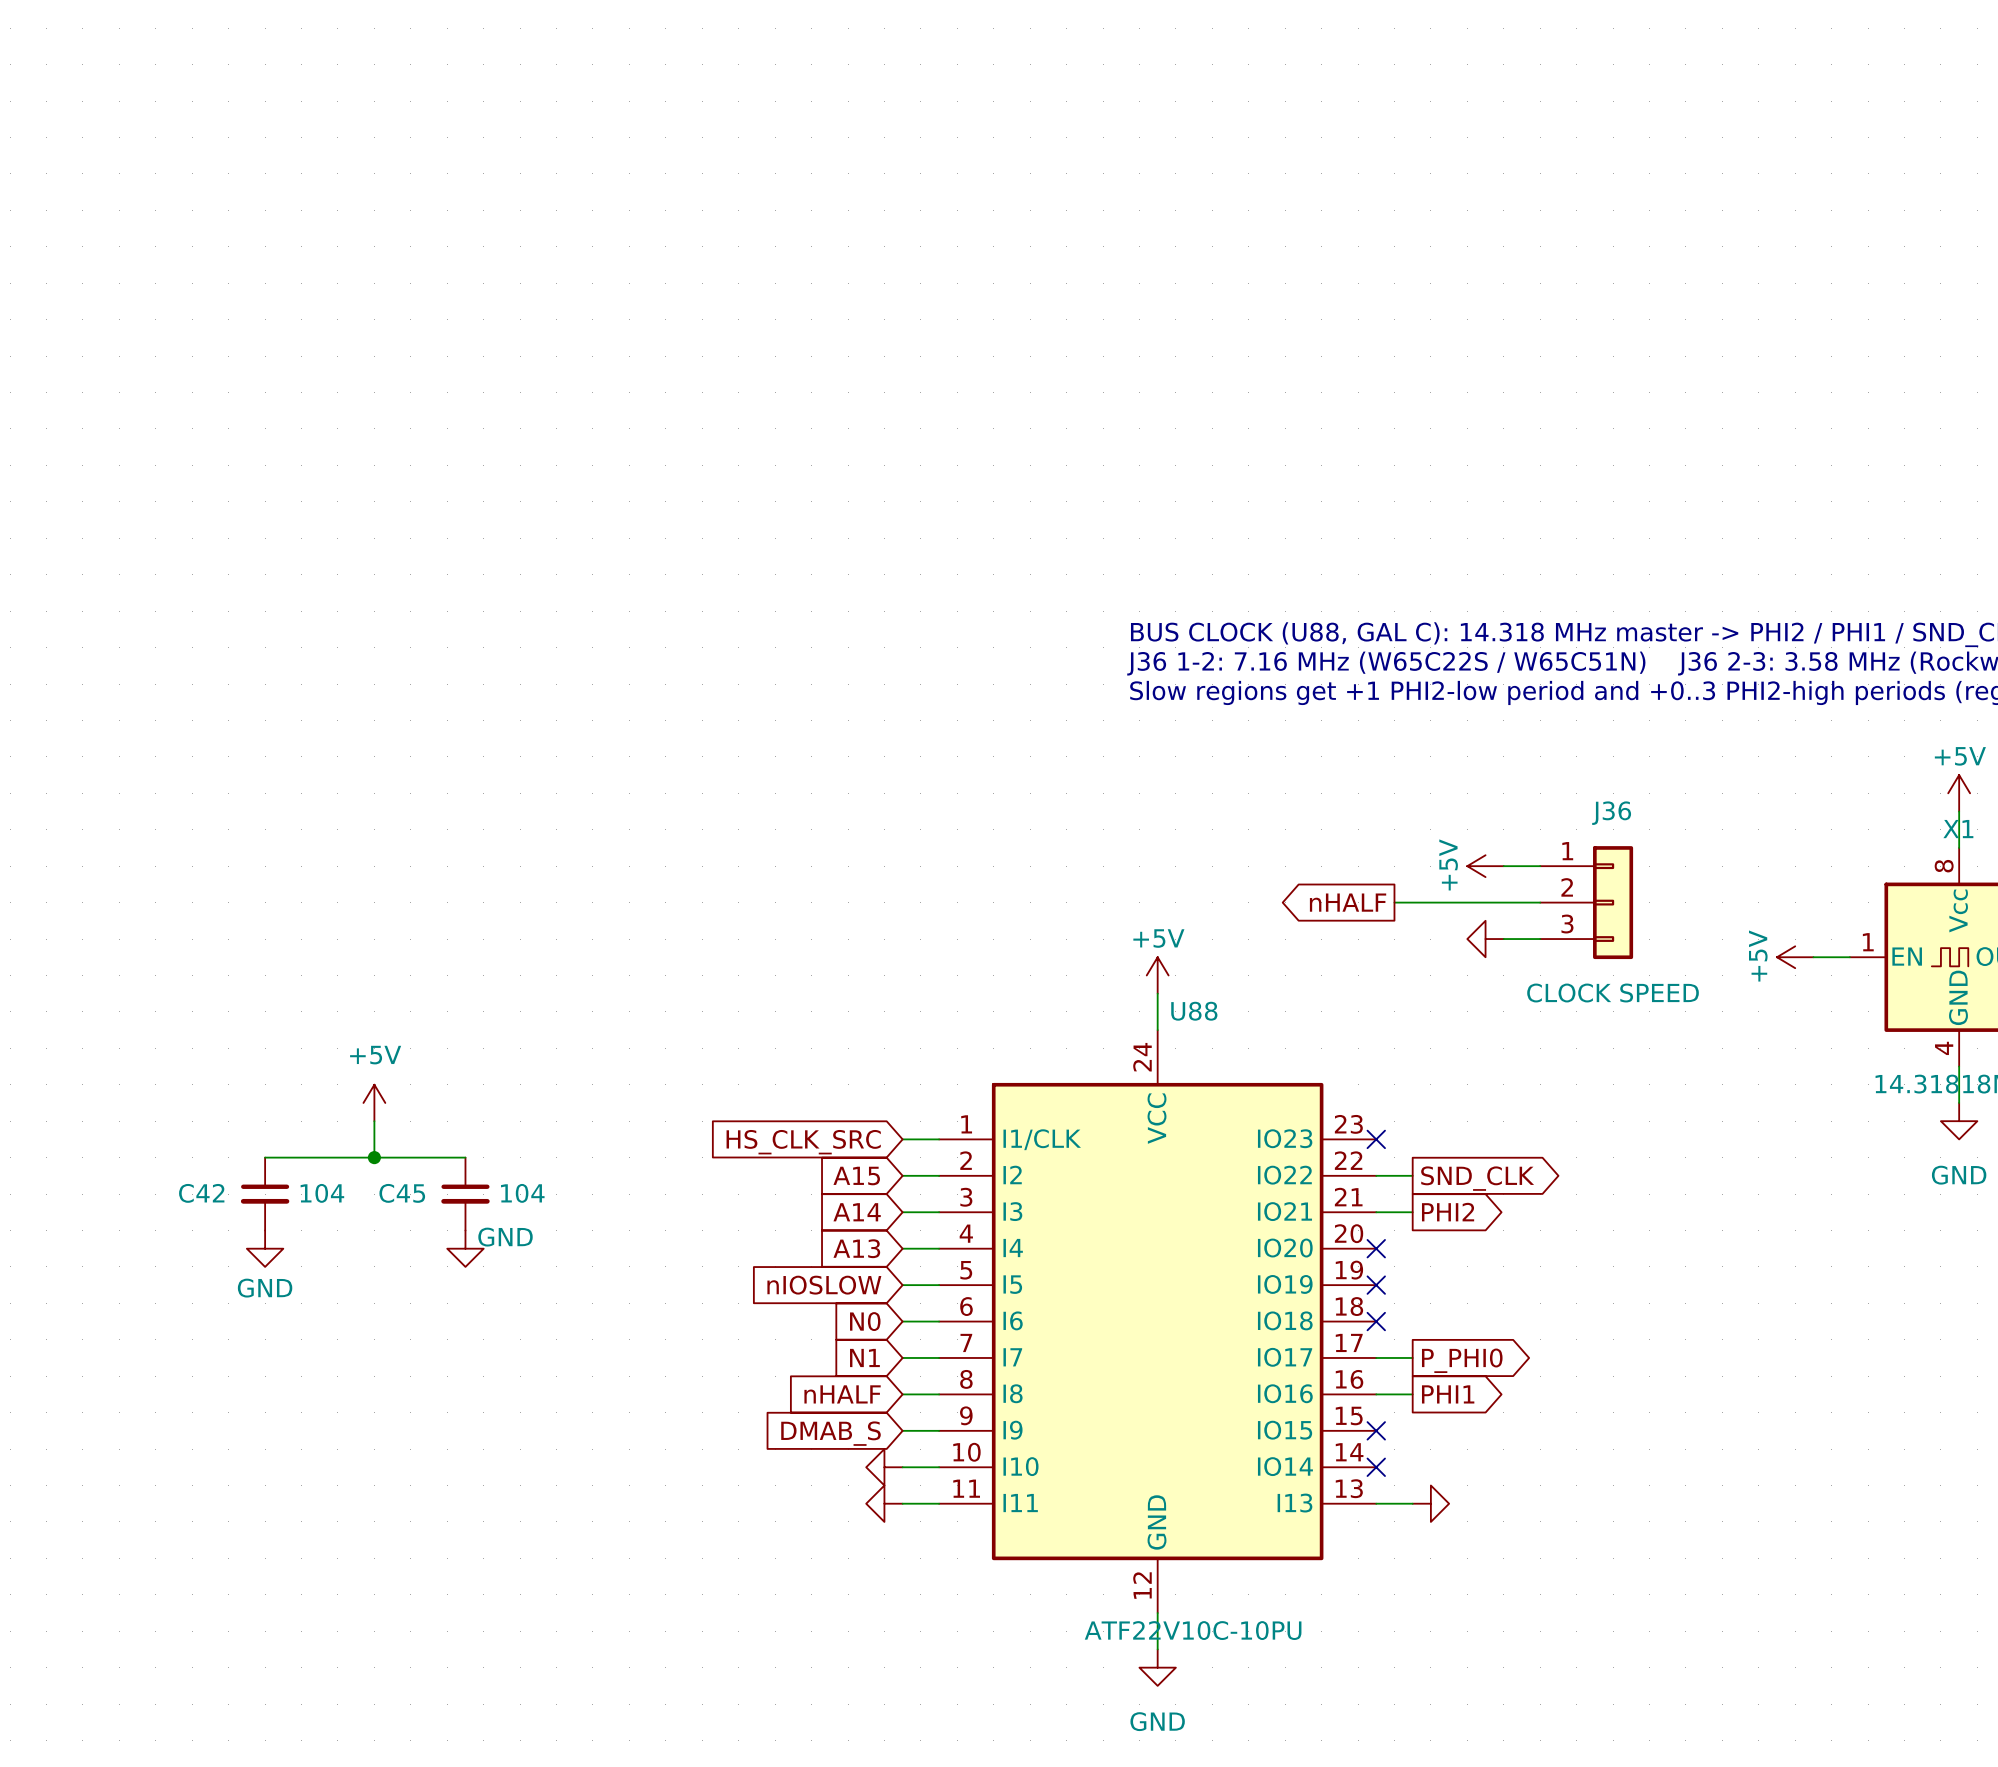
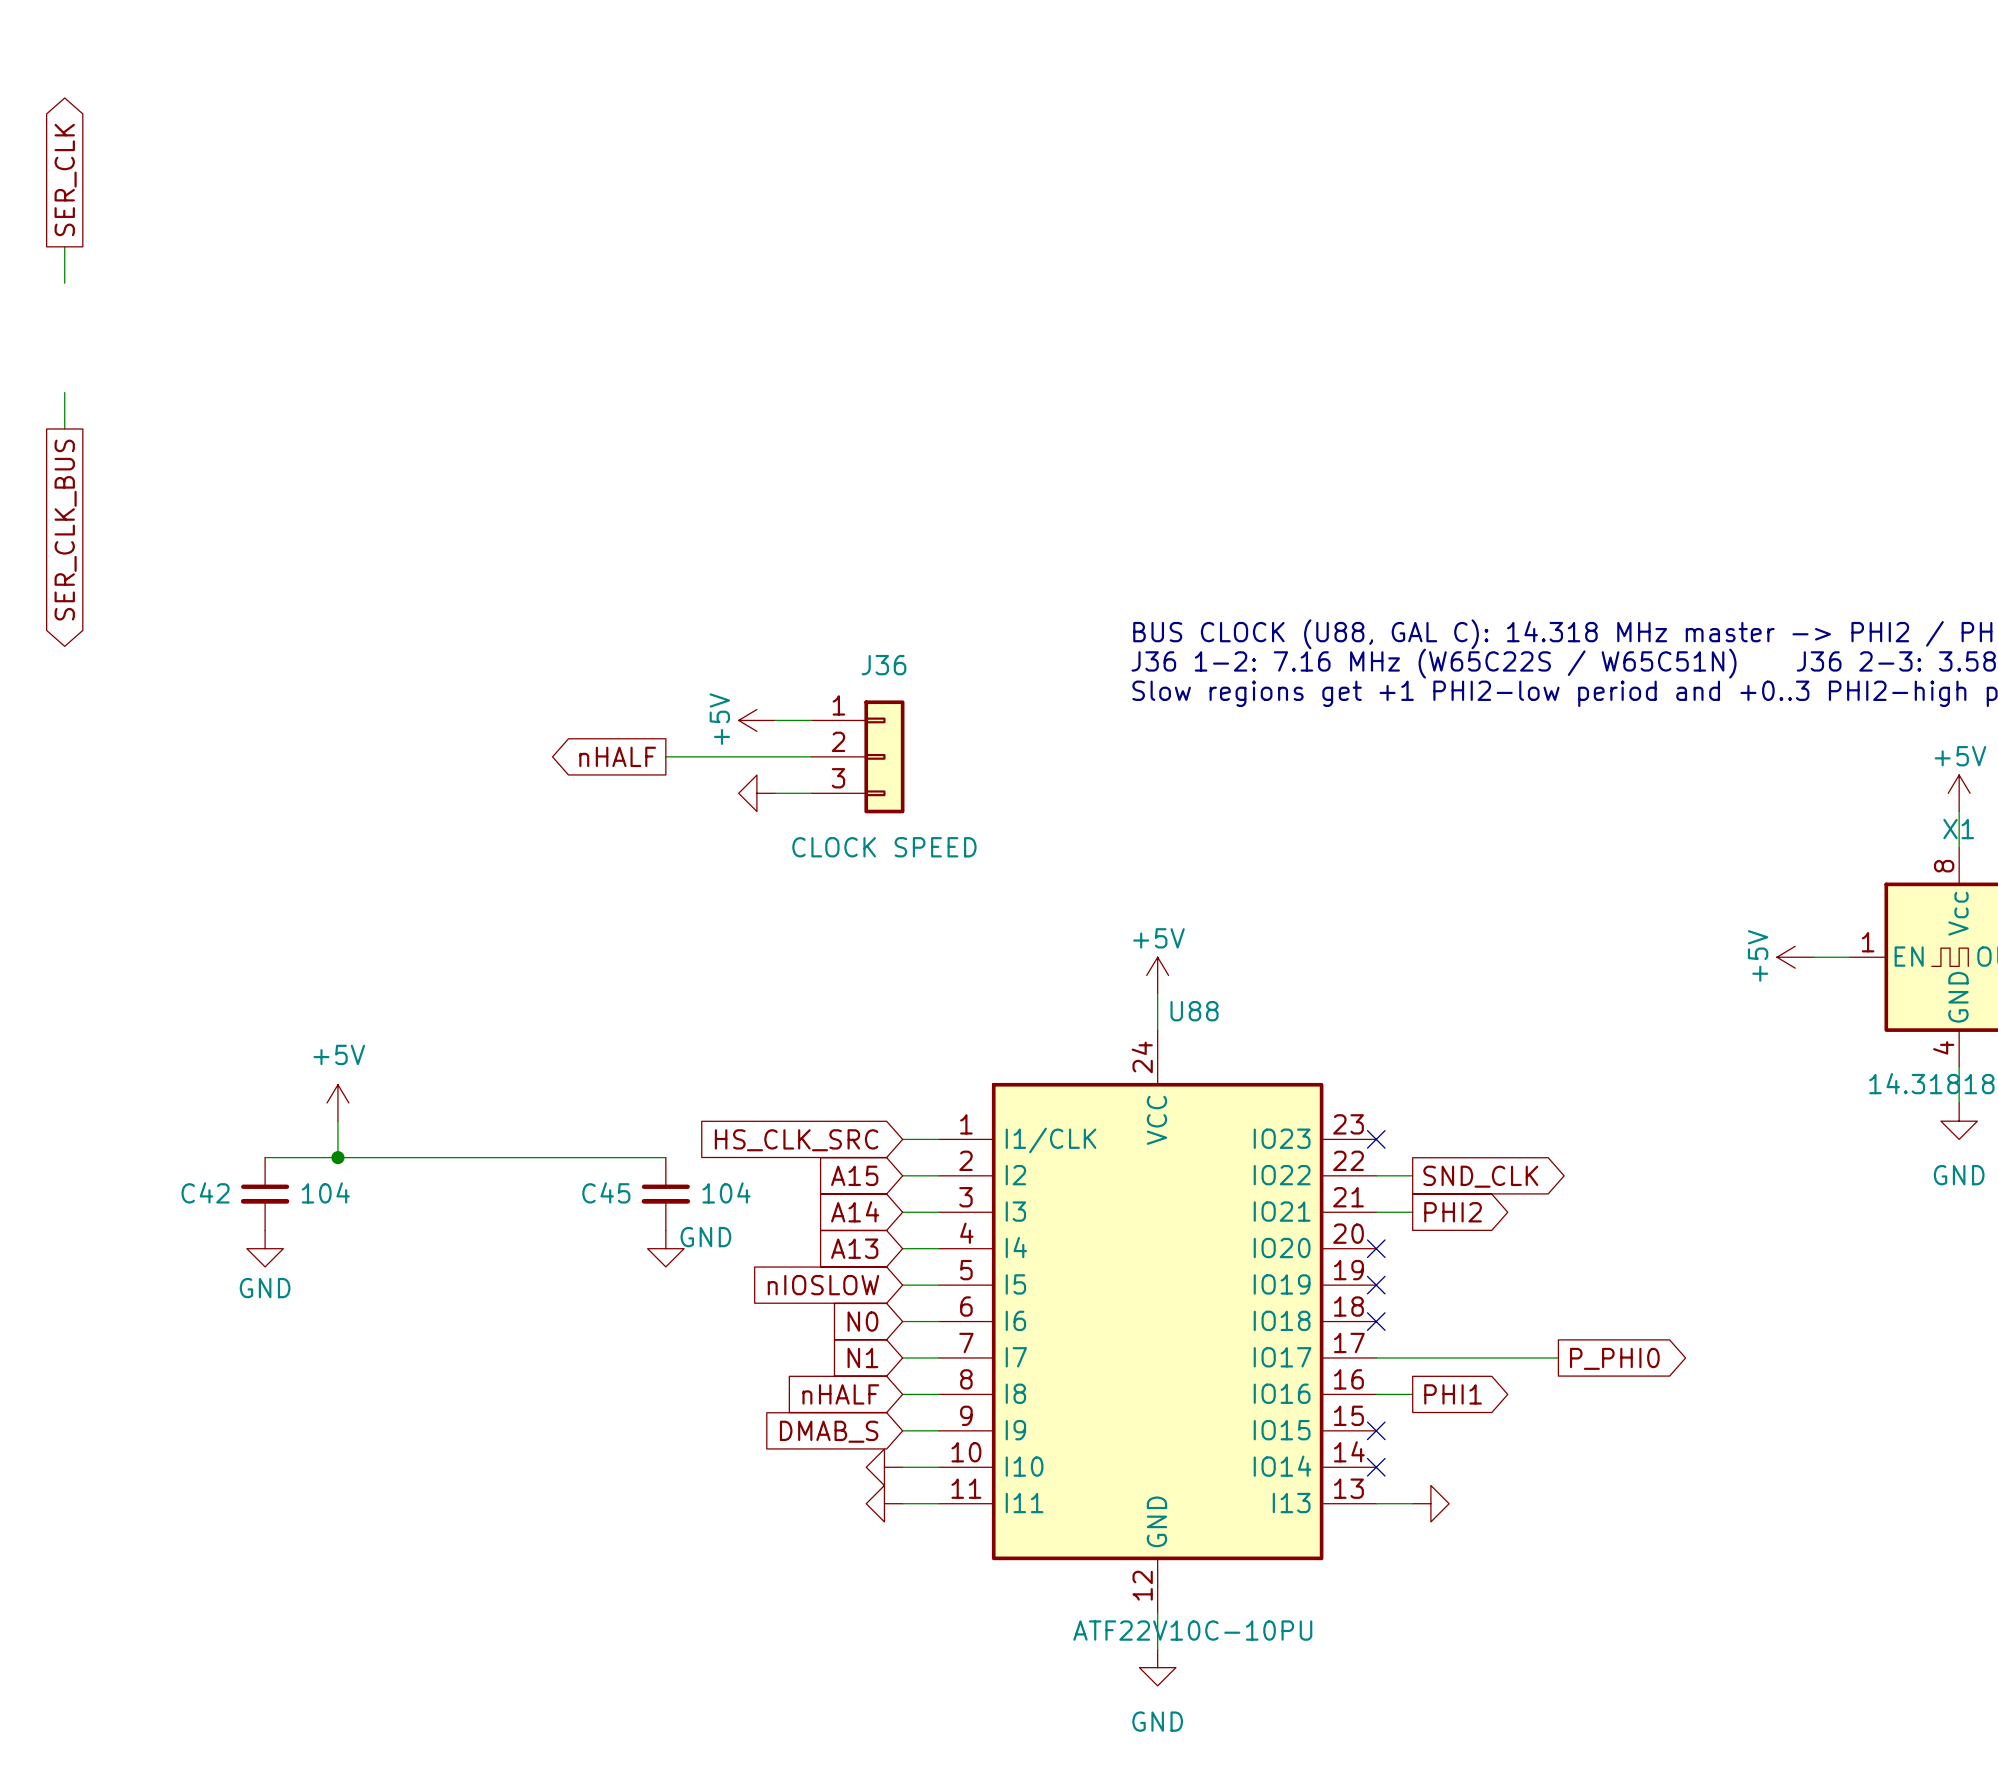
global label: none -> SER_CLK (65, 180)
wire: none -> (64, 246) (64, 283)
wire: none -> (64, 392) (64, 428)
global label: none -> SER_CLK_BUS (65, 530)
power symbol: none -> +5V (756, 720)
wire: none -> (775, 720) (811, 720)
global label: none -> nHALF (617, 756)
wire: none -> (665, 756) (811, 756)
power symbol: none -> (756, 793)
wire: none -> (775, 793) (811, 793)
power symbol: +5V (1485, 866) -> none
wire: (1503, 866) (1540, 866) -> none
global label: nHALF (1348, 902) -> none
wire: (1394, 902) (1540, 902) -> none
J36 position: (1586, 902) -> (858, 756)
power symbol: (1485, 939) -> none
wire: (1503, 939) (1540, 939) -> none
power symbol position: +5V (374, 1102) -> +5V (337, 1102)
wire: (374, 1121) (374, 1157) -> (337, 1121) (337, 1157)
junction position: (374, 1157) -> (337, 1157)
wire: none -> (465, 1157) (665, 1157)
C45 position: (465, 1194) -> (665, 1194)
power symbol position: GND (465, 1248) -> GND (665, 1248)
wire: none -> (1412, 1357) (1558, 1357)
global label position: P_PHI0 (1462, 1360) -> P_PHI0 (1614, 1358)

